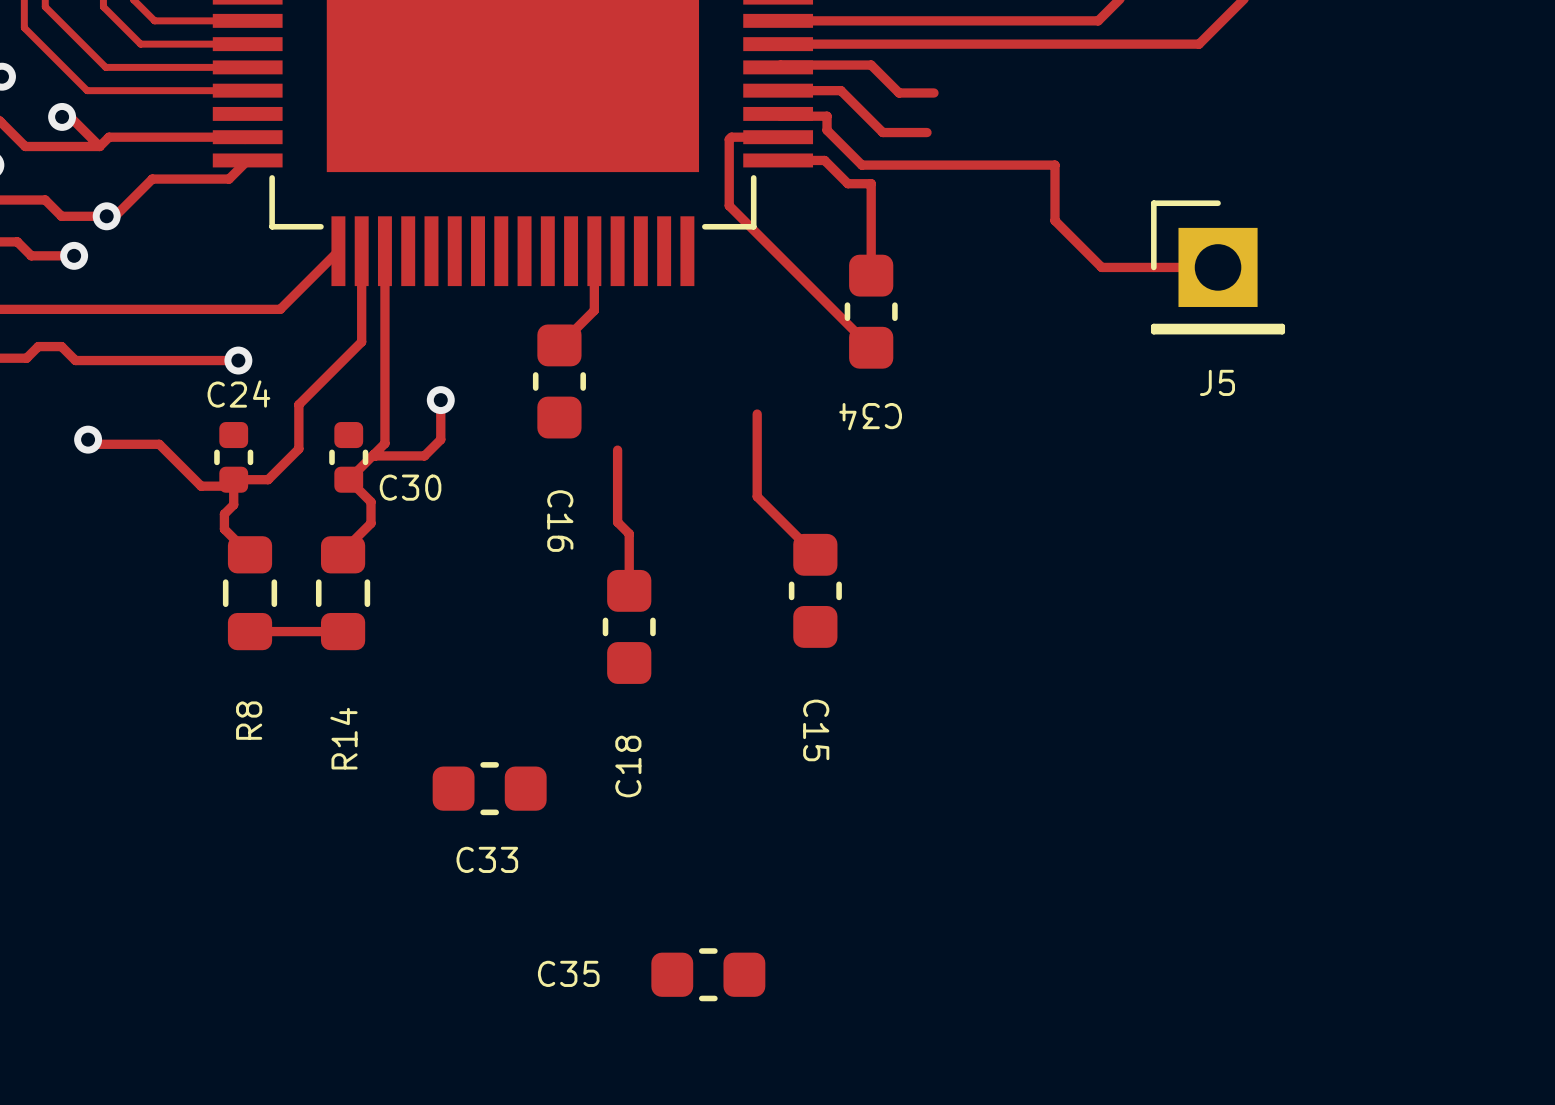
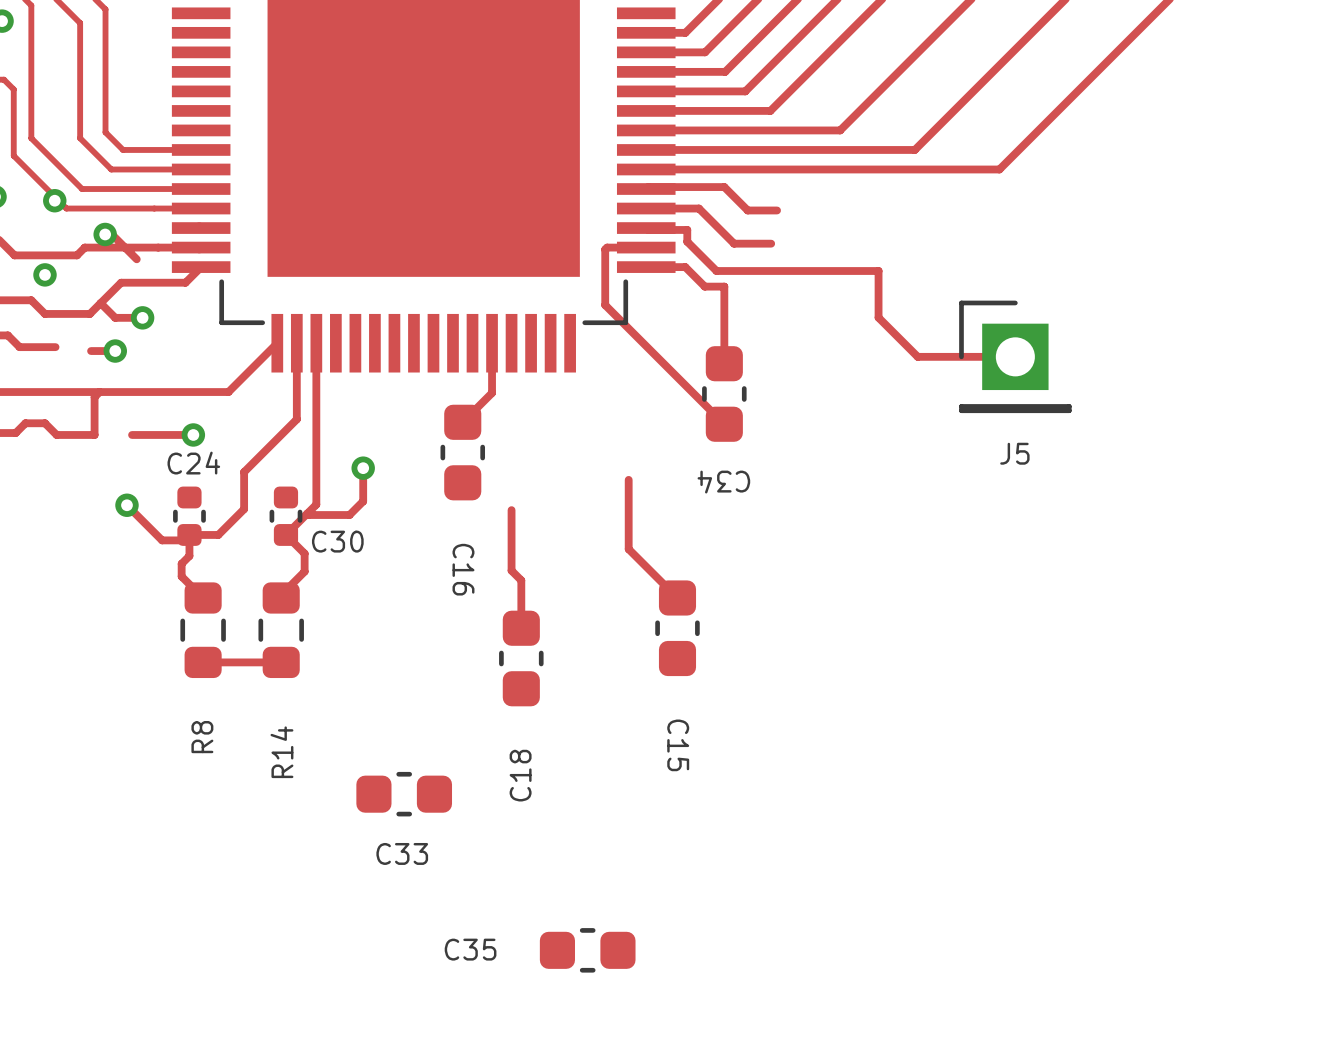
via: none -> (54, 200)
track: (62, 116) (70, 116) (99, 146) -> (105, 234) (111, 234) (136, 259)
via: (62, 116) -> none
via: none -> (105, 234)
via: none -> (45, 274)
track: none -> (100, 303) (115, 317) (142, 317)
via: (106, 216) -> none
via: none -> (142, 317)
via: (74, 255) -> none
track: none -> (91, 351) (115, 351)
via: none -> (115, 351)
track: (120, 360) (165, 360) -> (94, 434) (94, 397) (99, 392)
track: (88, 439) (92, 444) (159, 444) -> none
via position: (88, 439) -> (126, 505)

